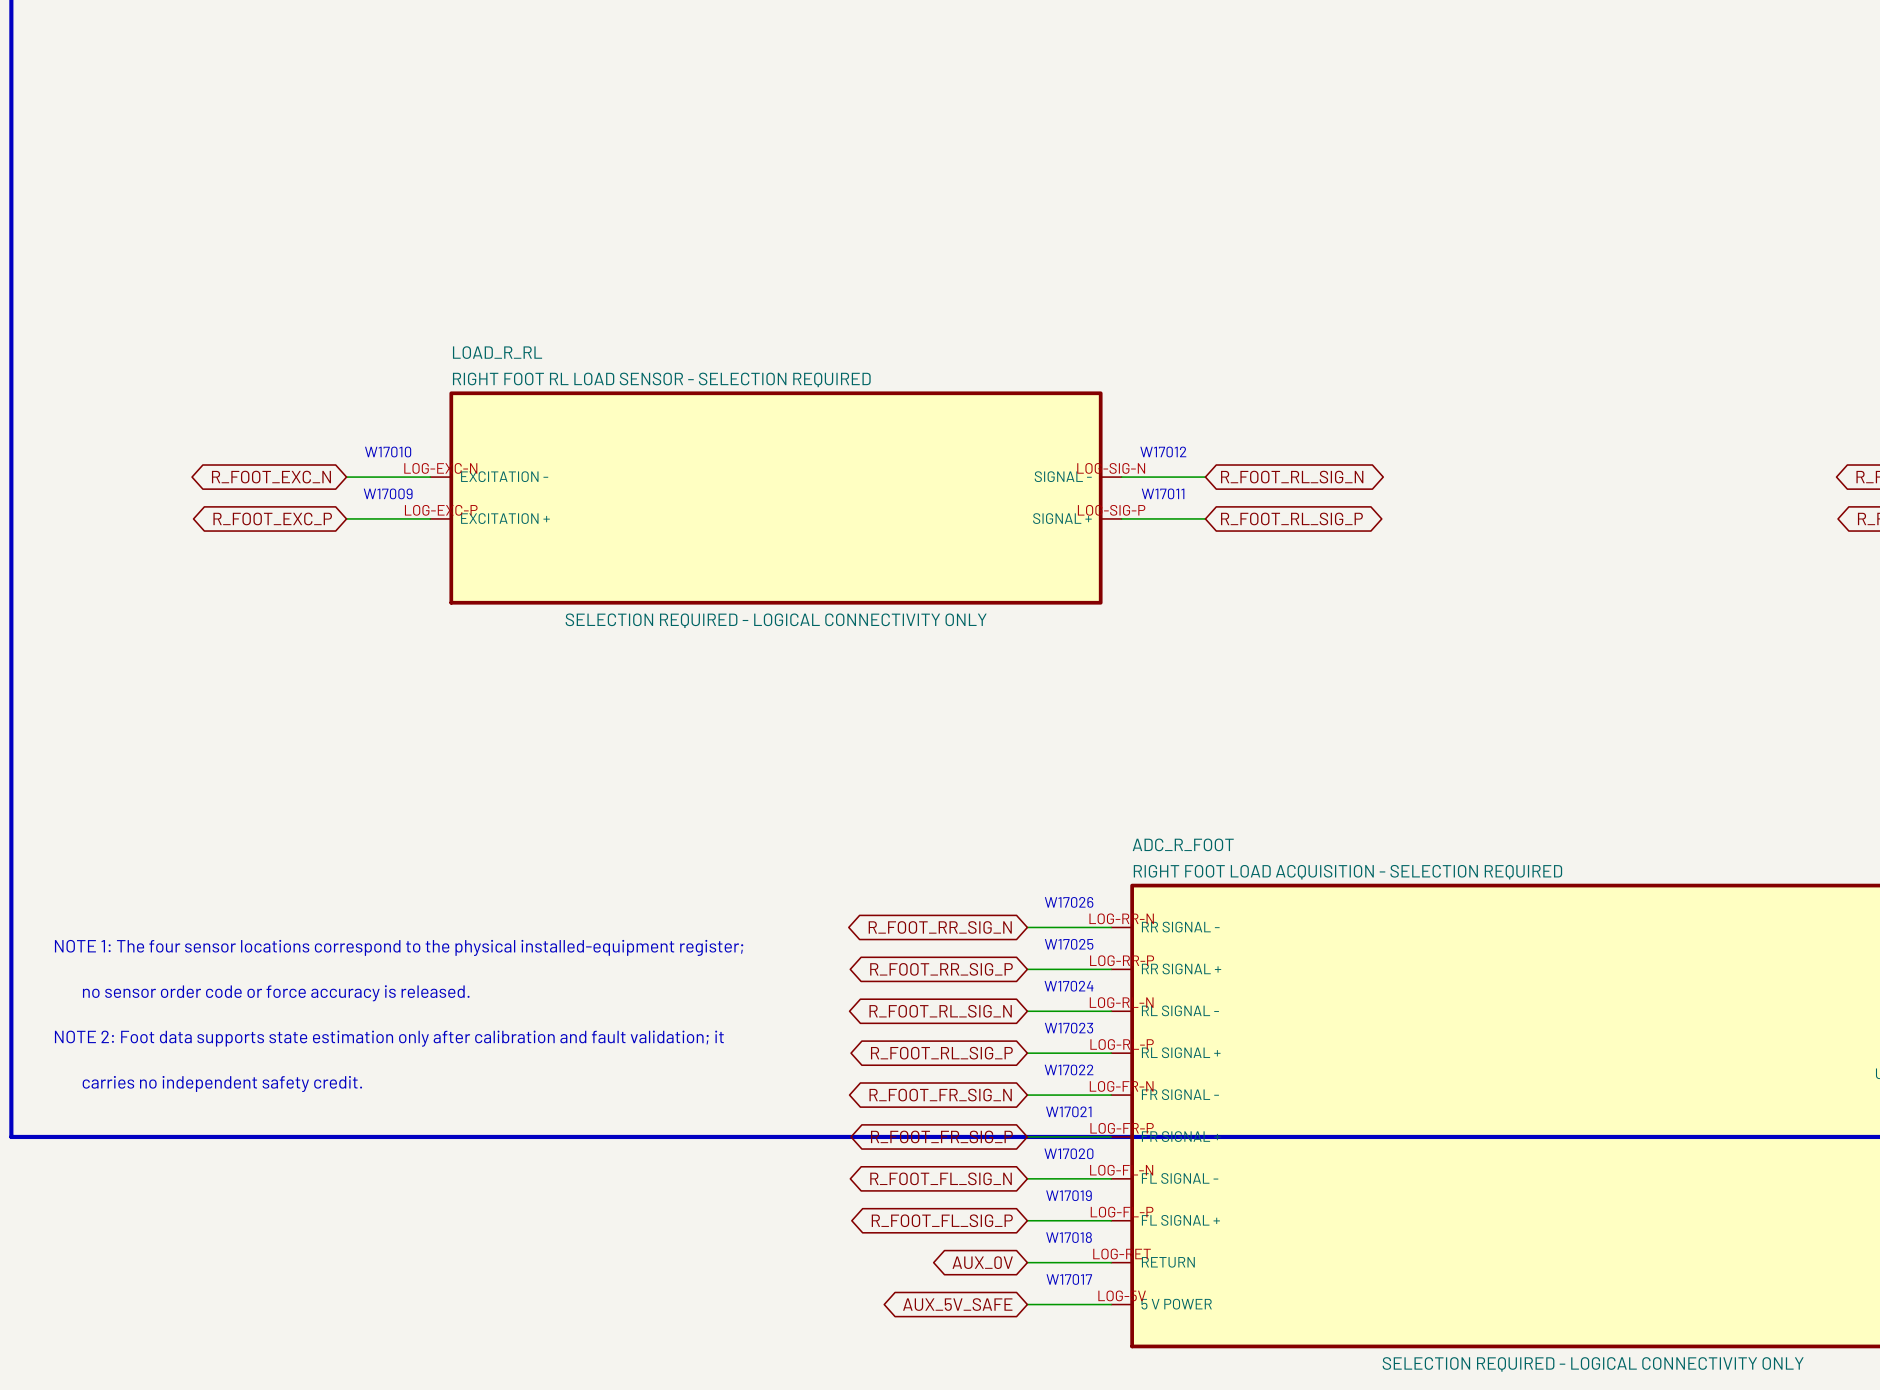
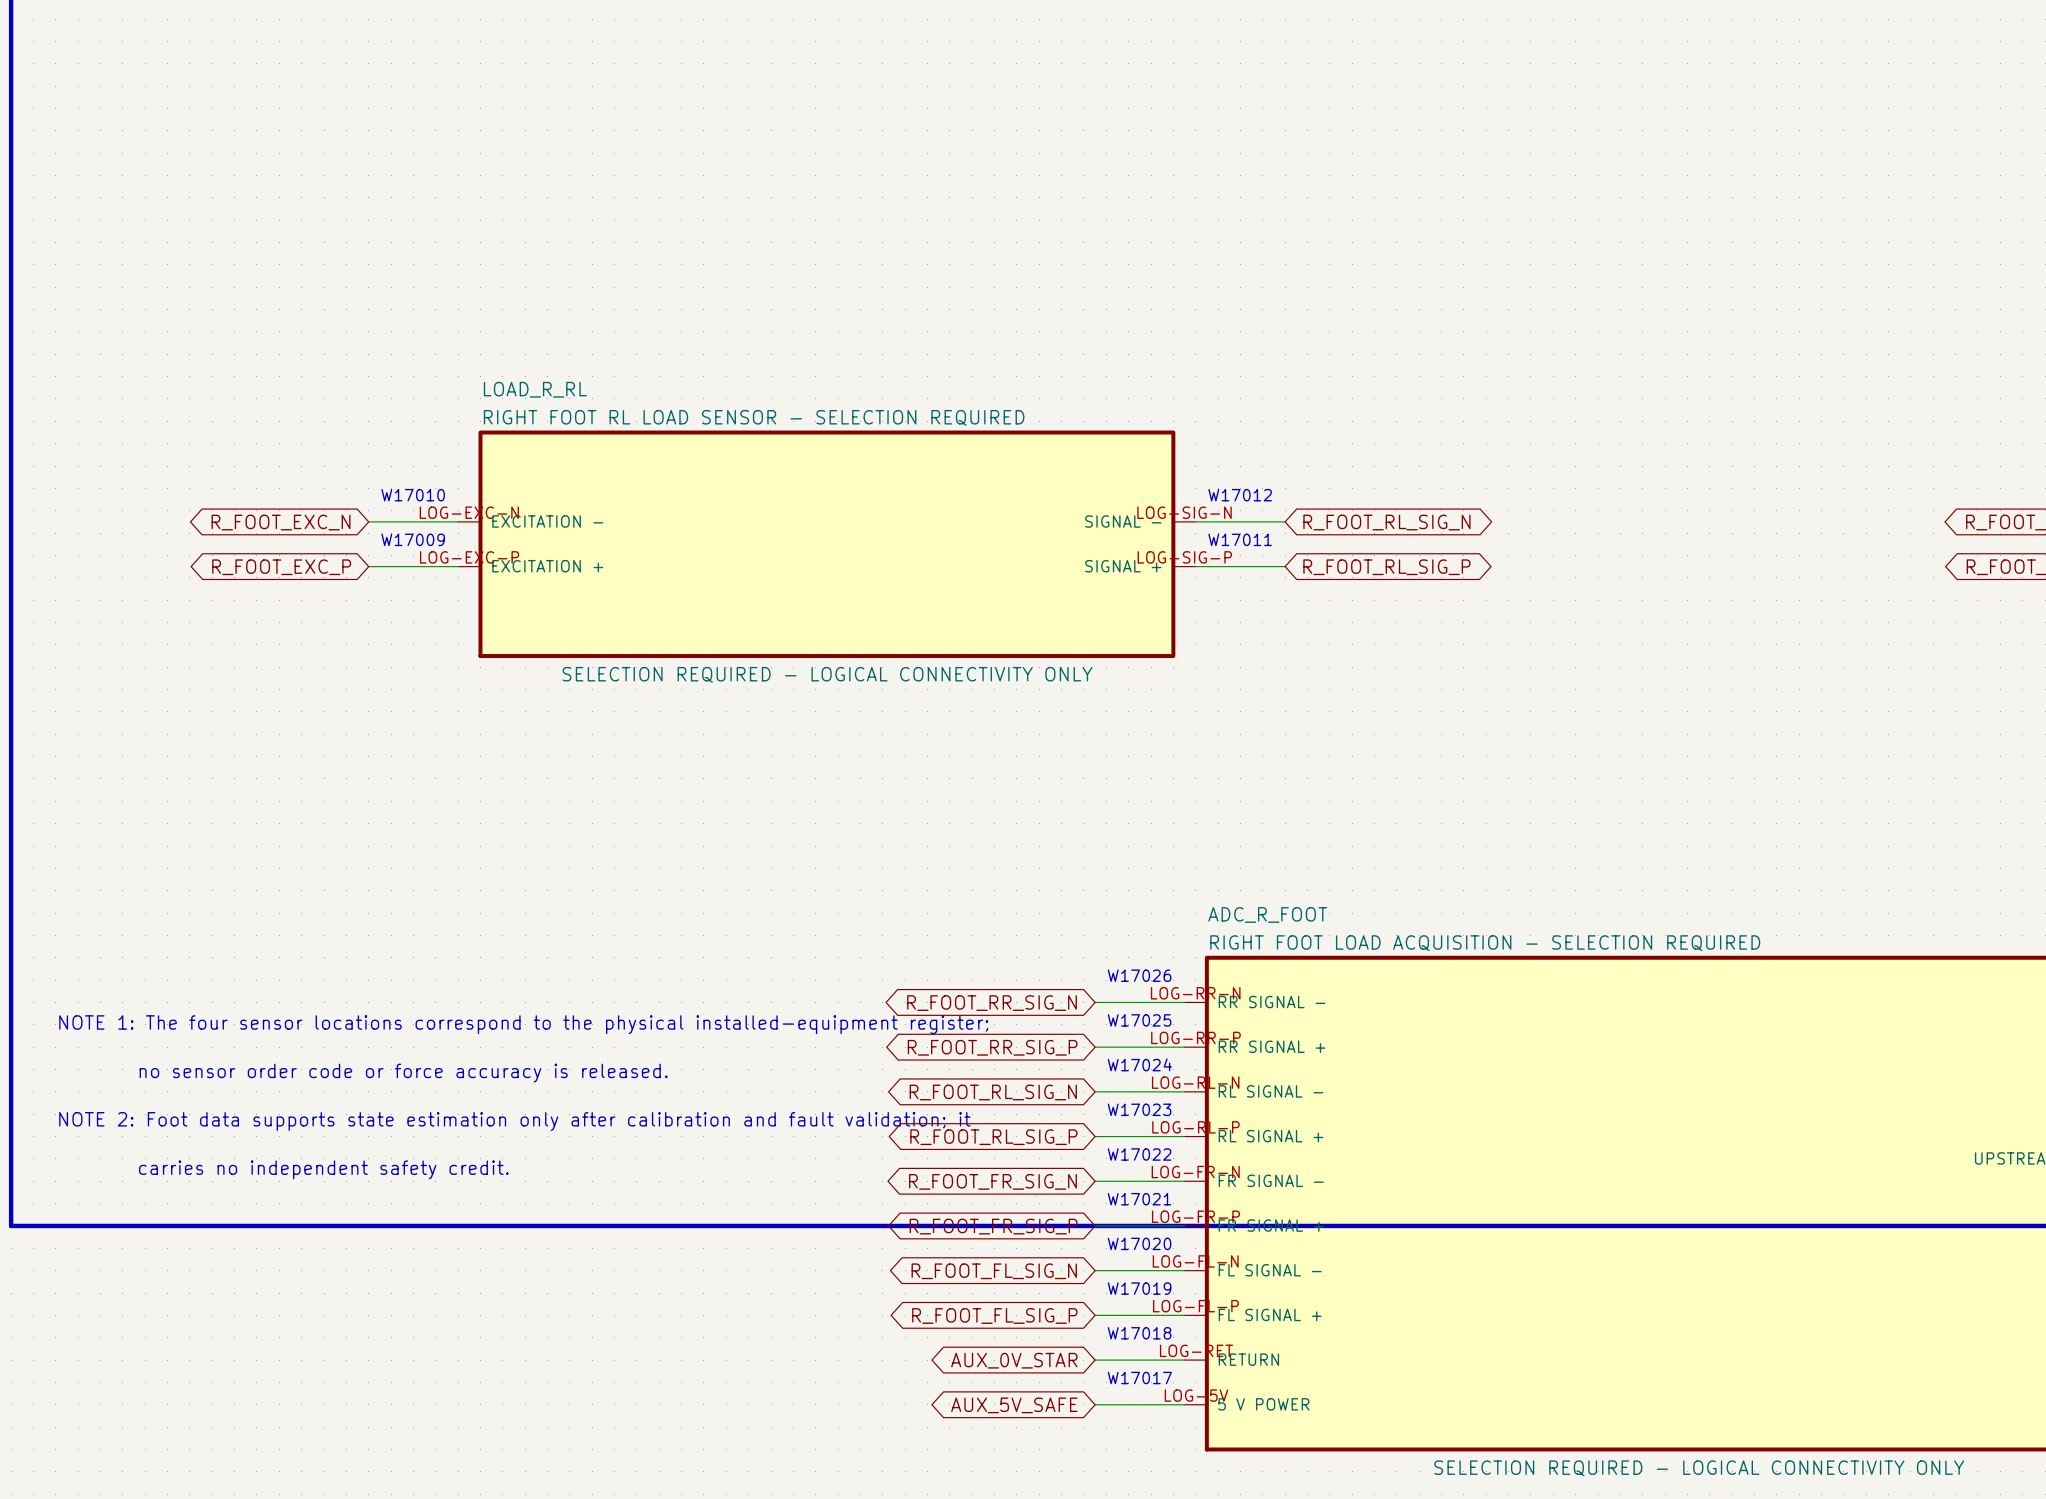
global label: AUX_0V (982, 1262) -> AUX_0V_STAR (1014, 1360)

